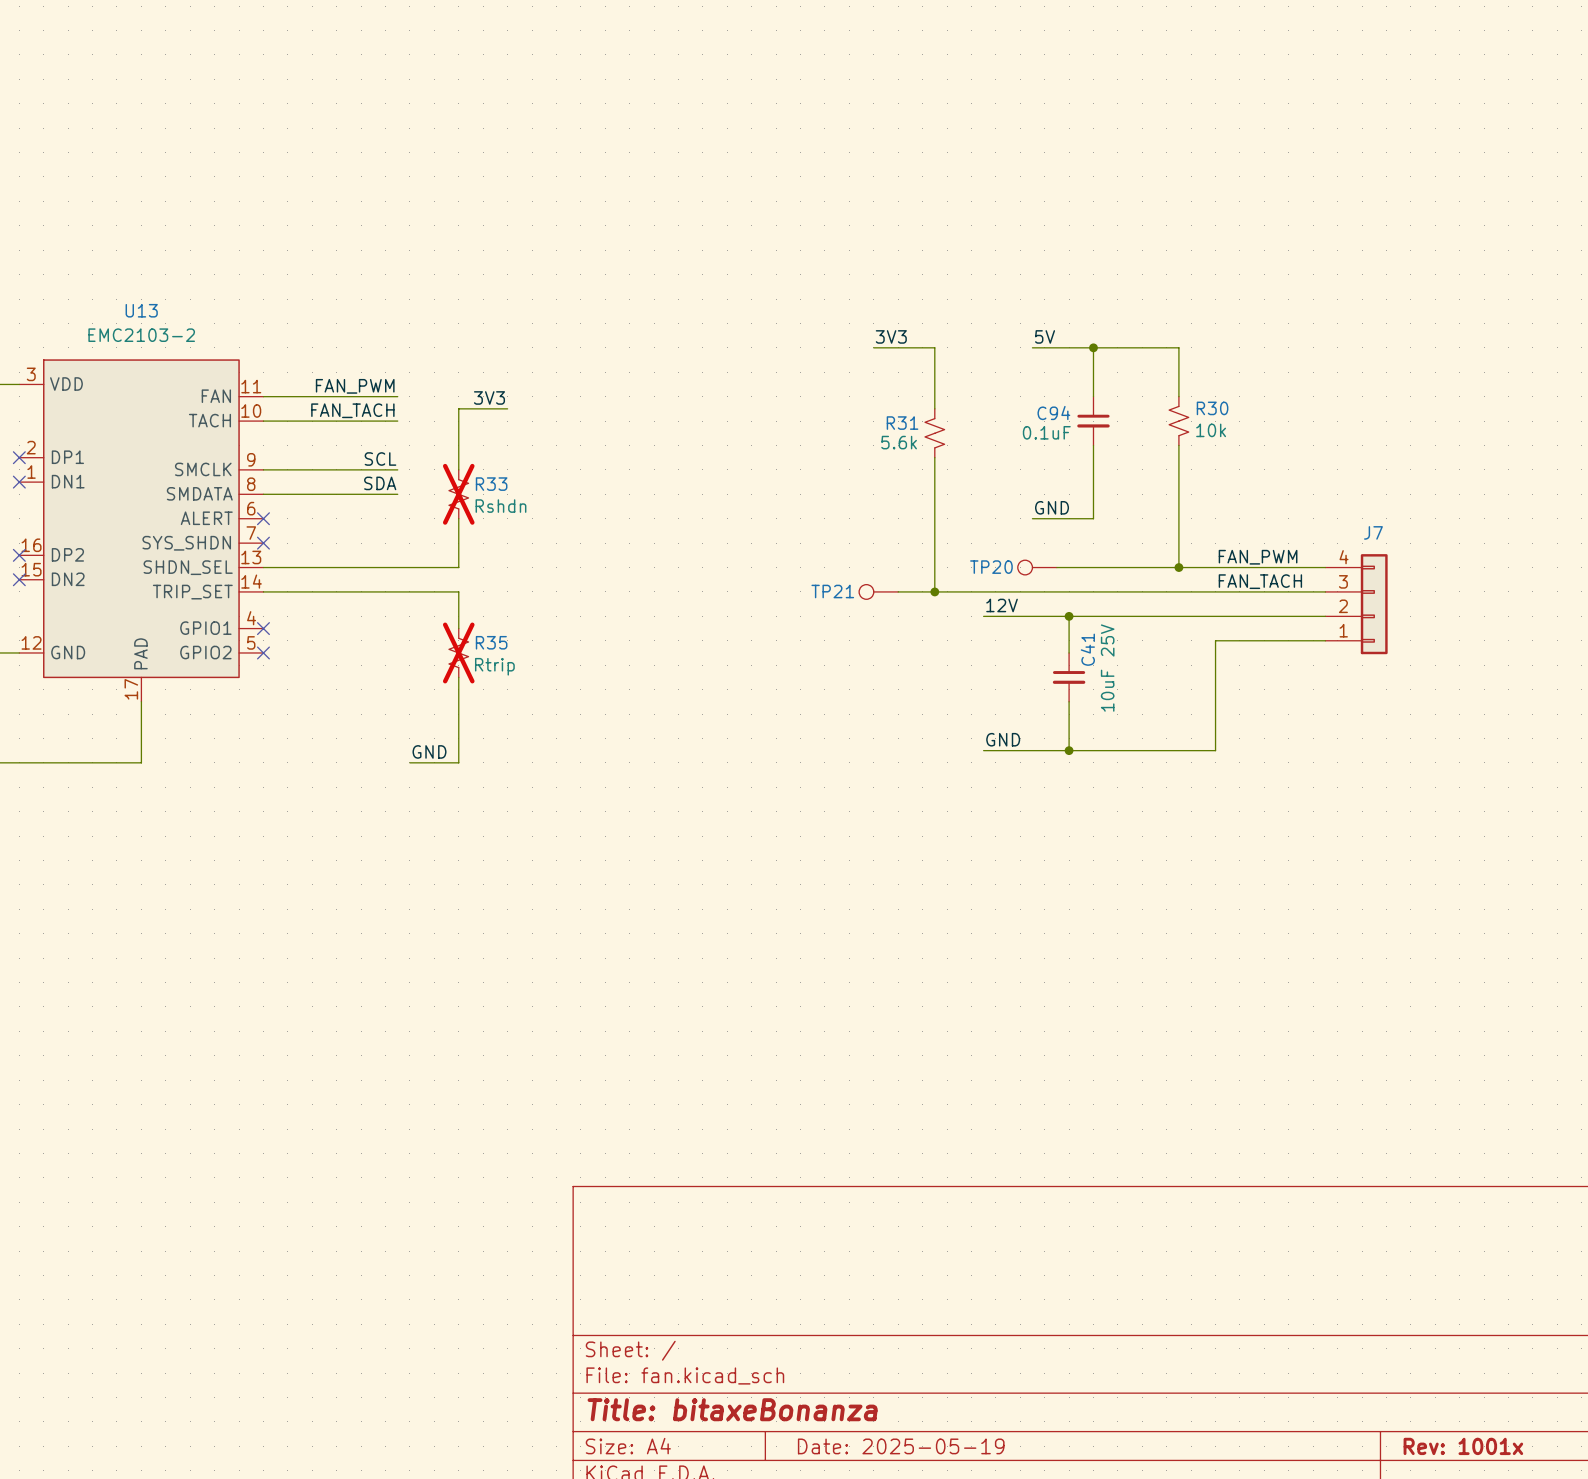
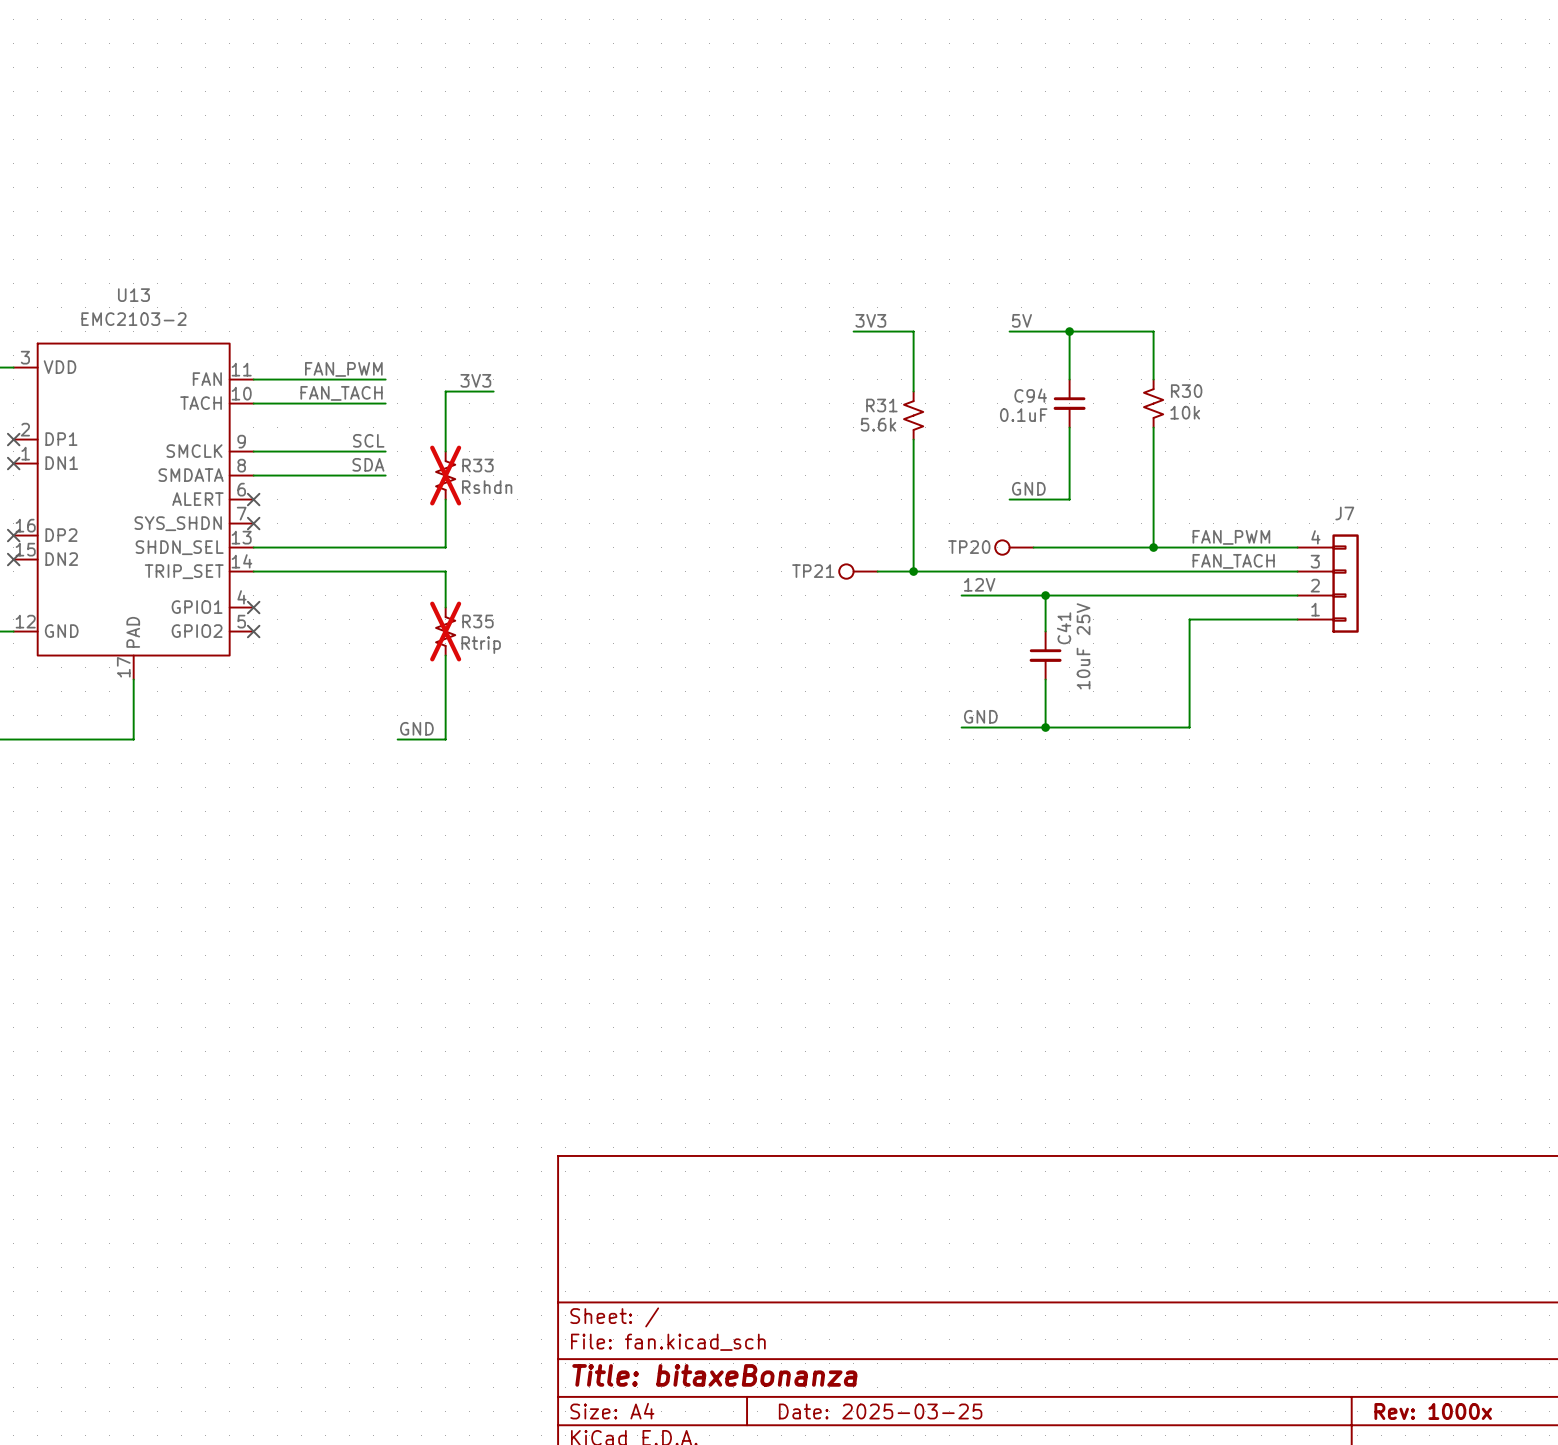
title block: Date: 2025-05-19 (901, 1446) -> Date: 2025-03-25 (880, 1411)
title block: Rev: 1001x (1463, 1446) -> Rev: 1000x (1433, 1411)

